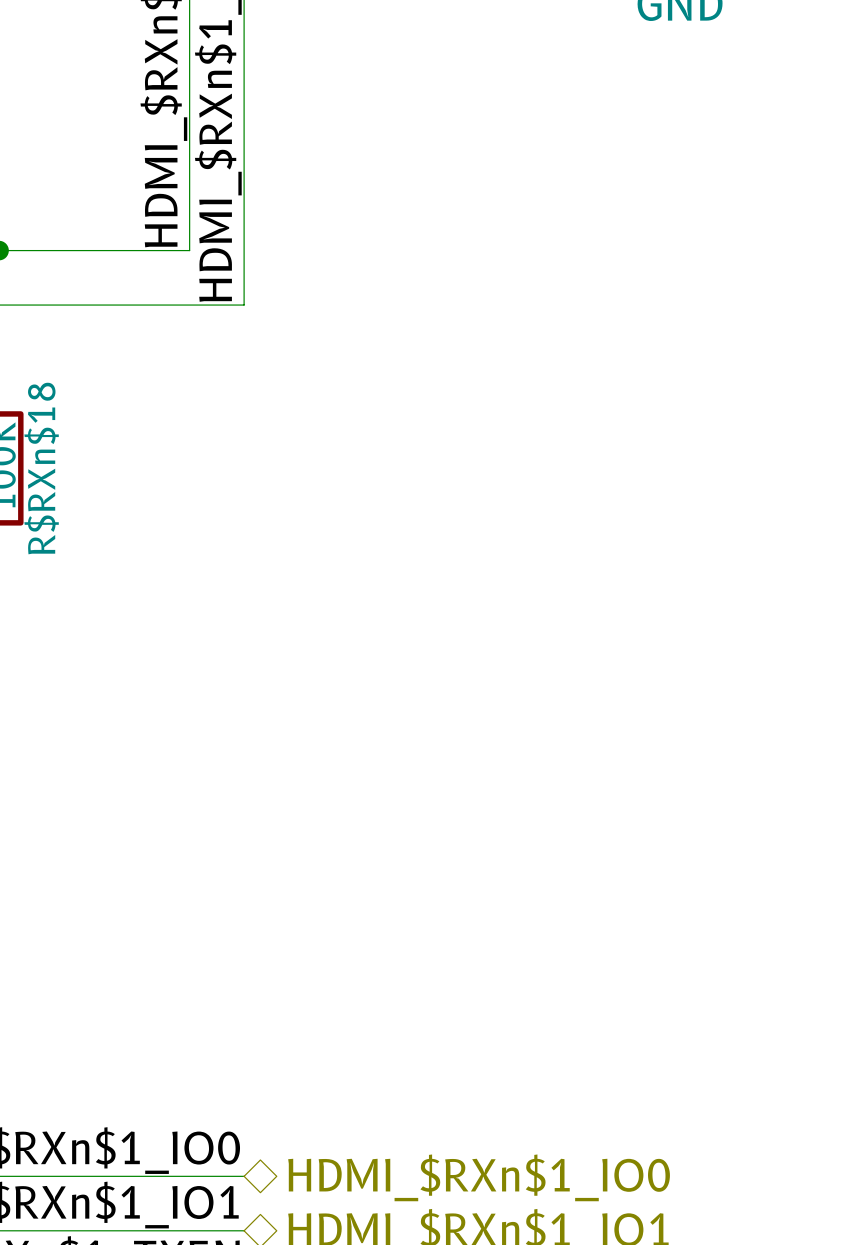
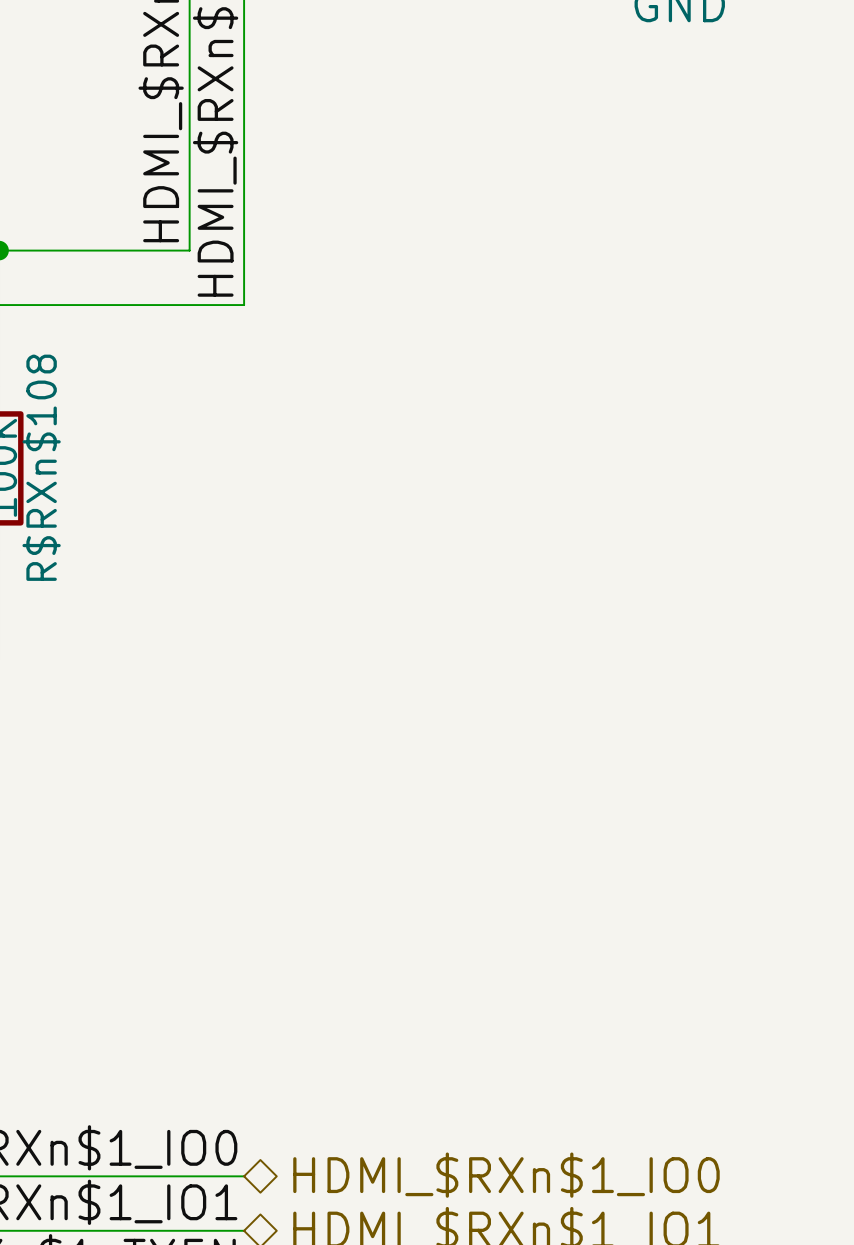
R$RXn$18 name: R$RXn$18 (41, 468) -> R$RXn$108 (41, 467)

